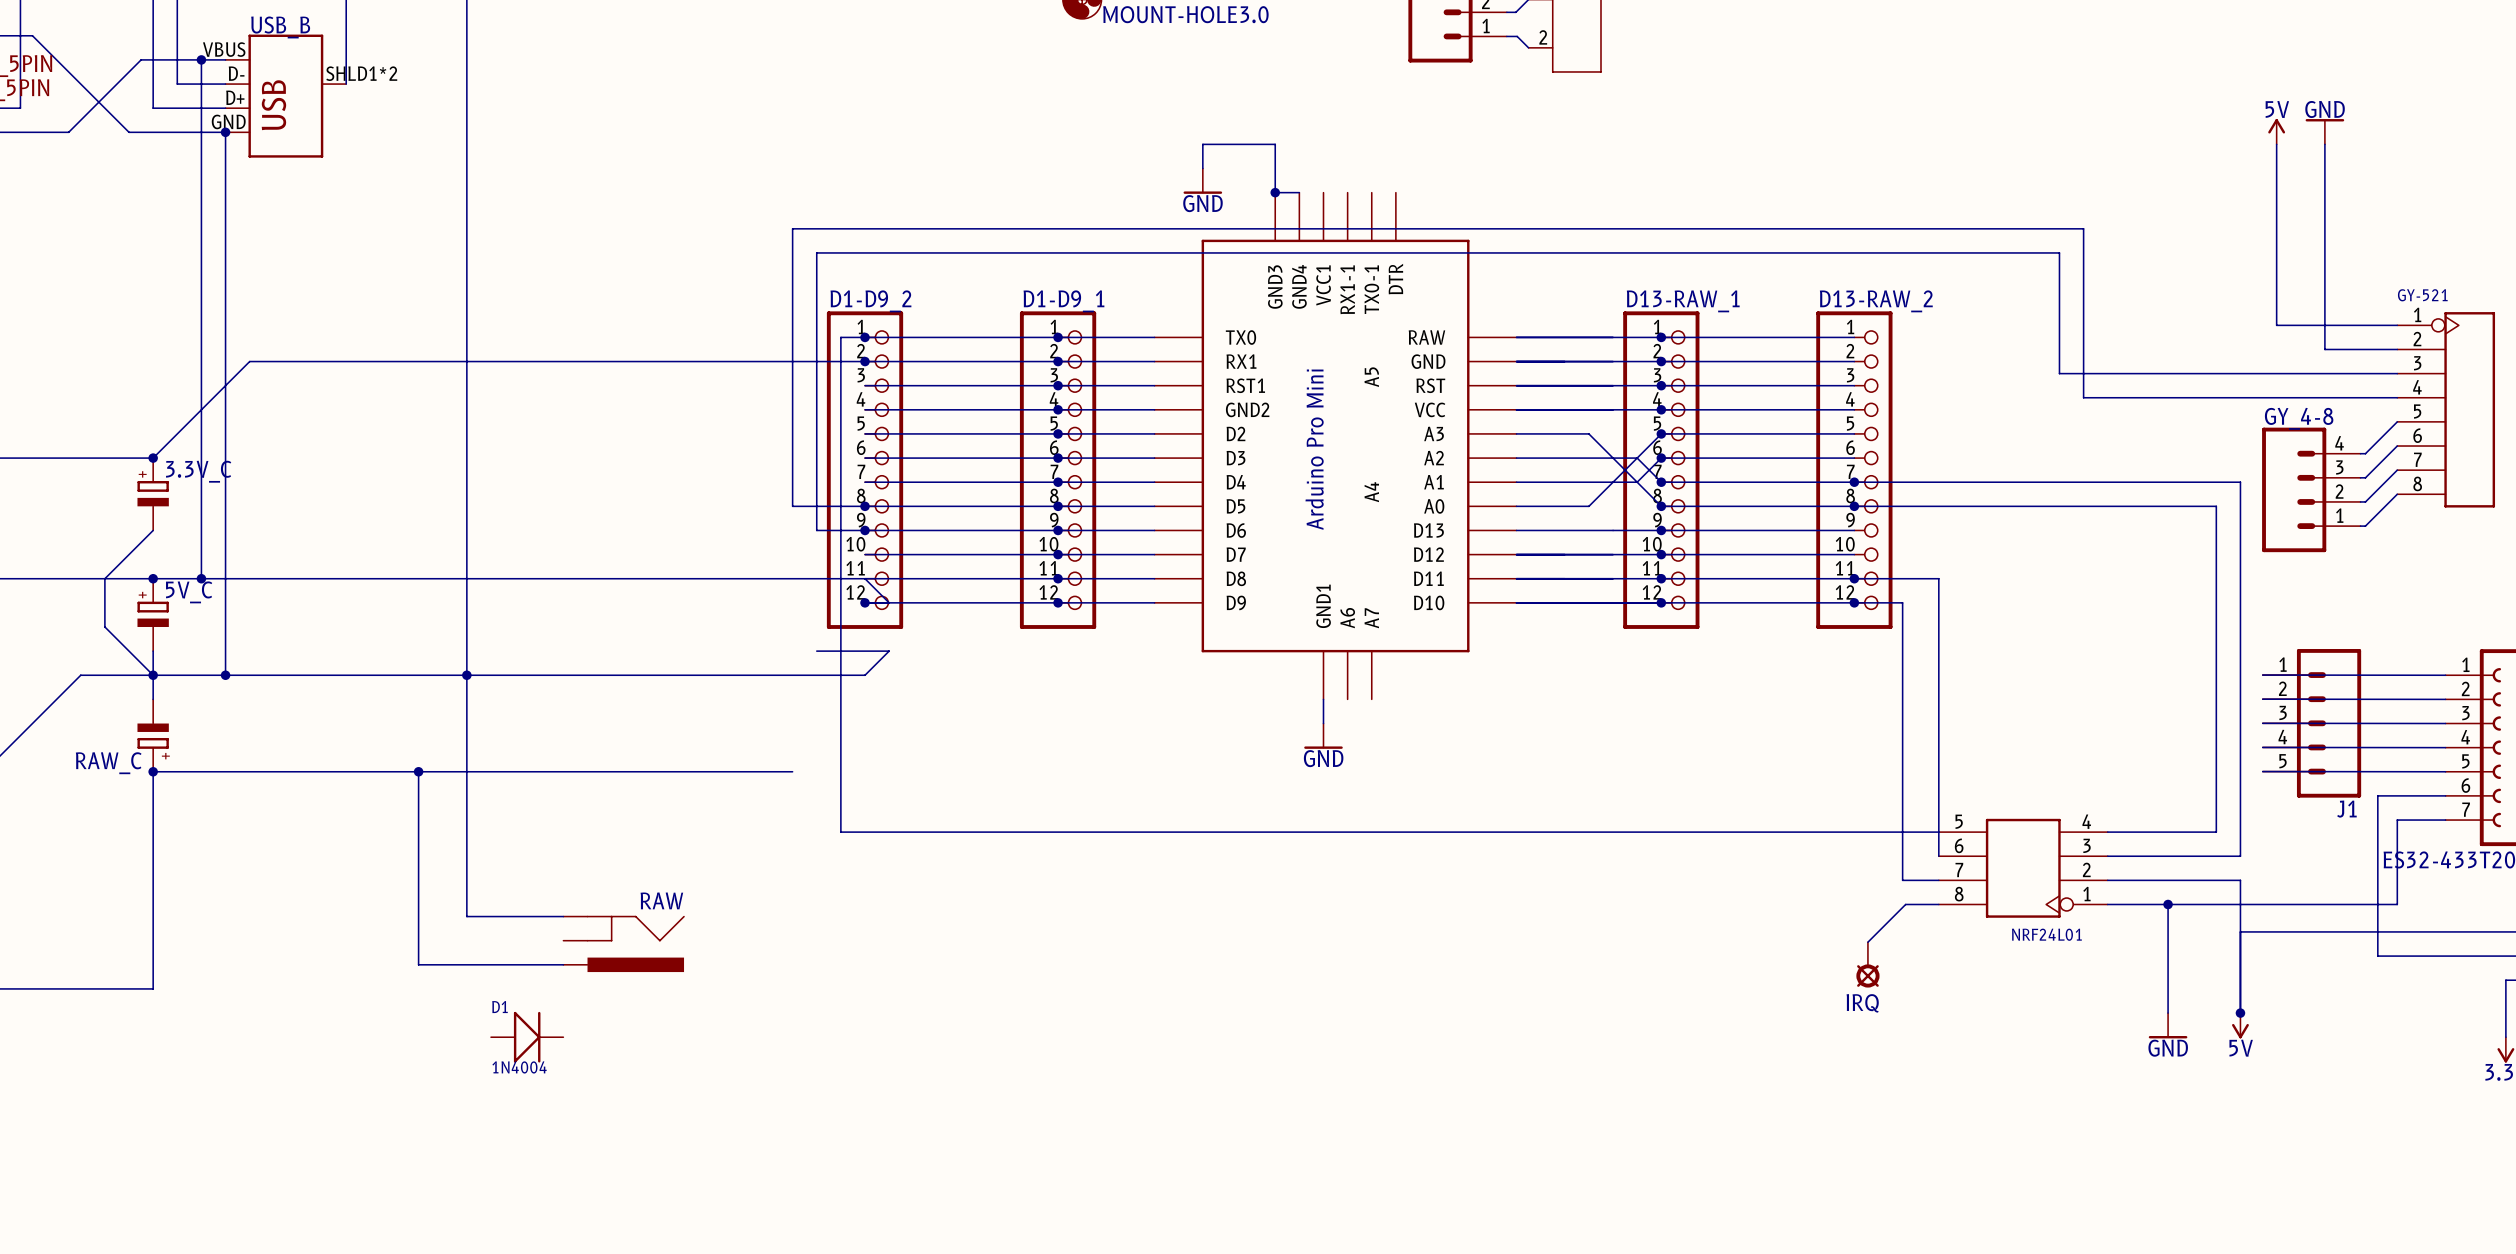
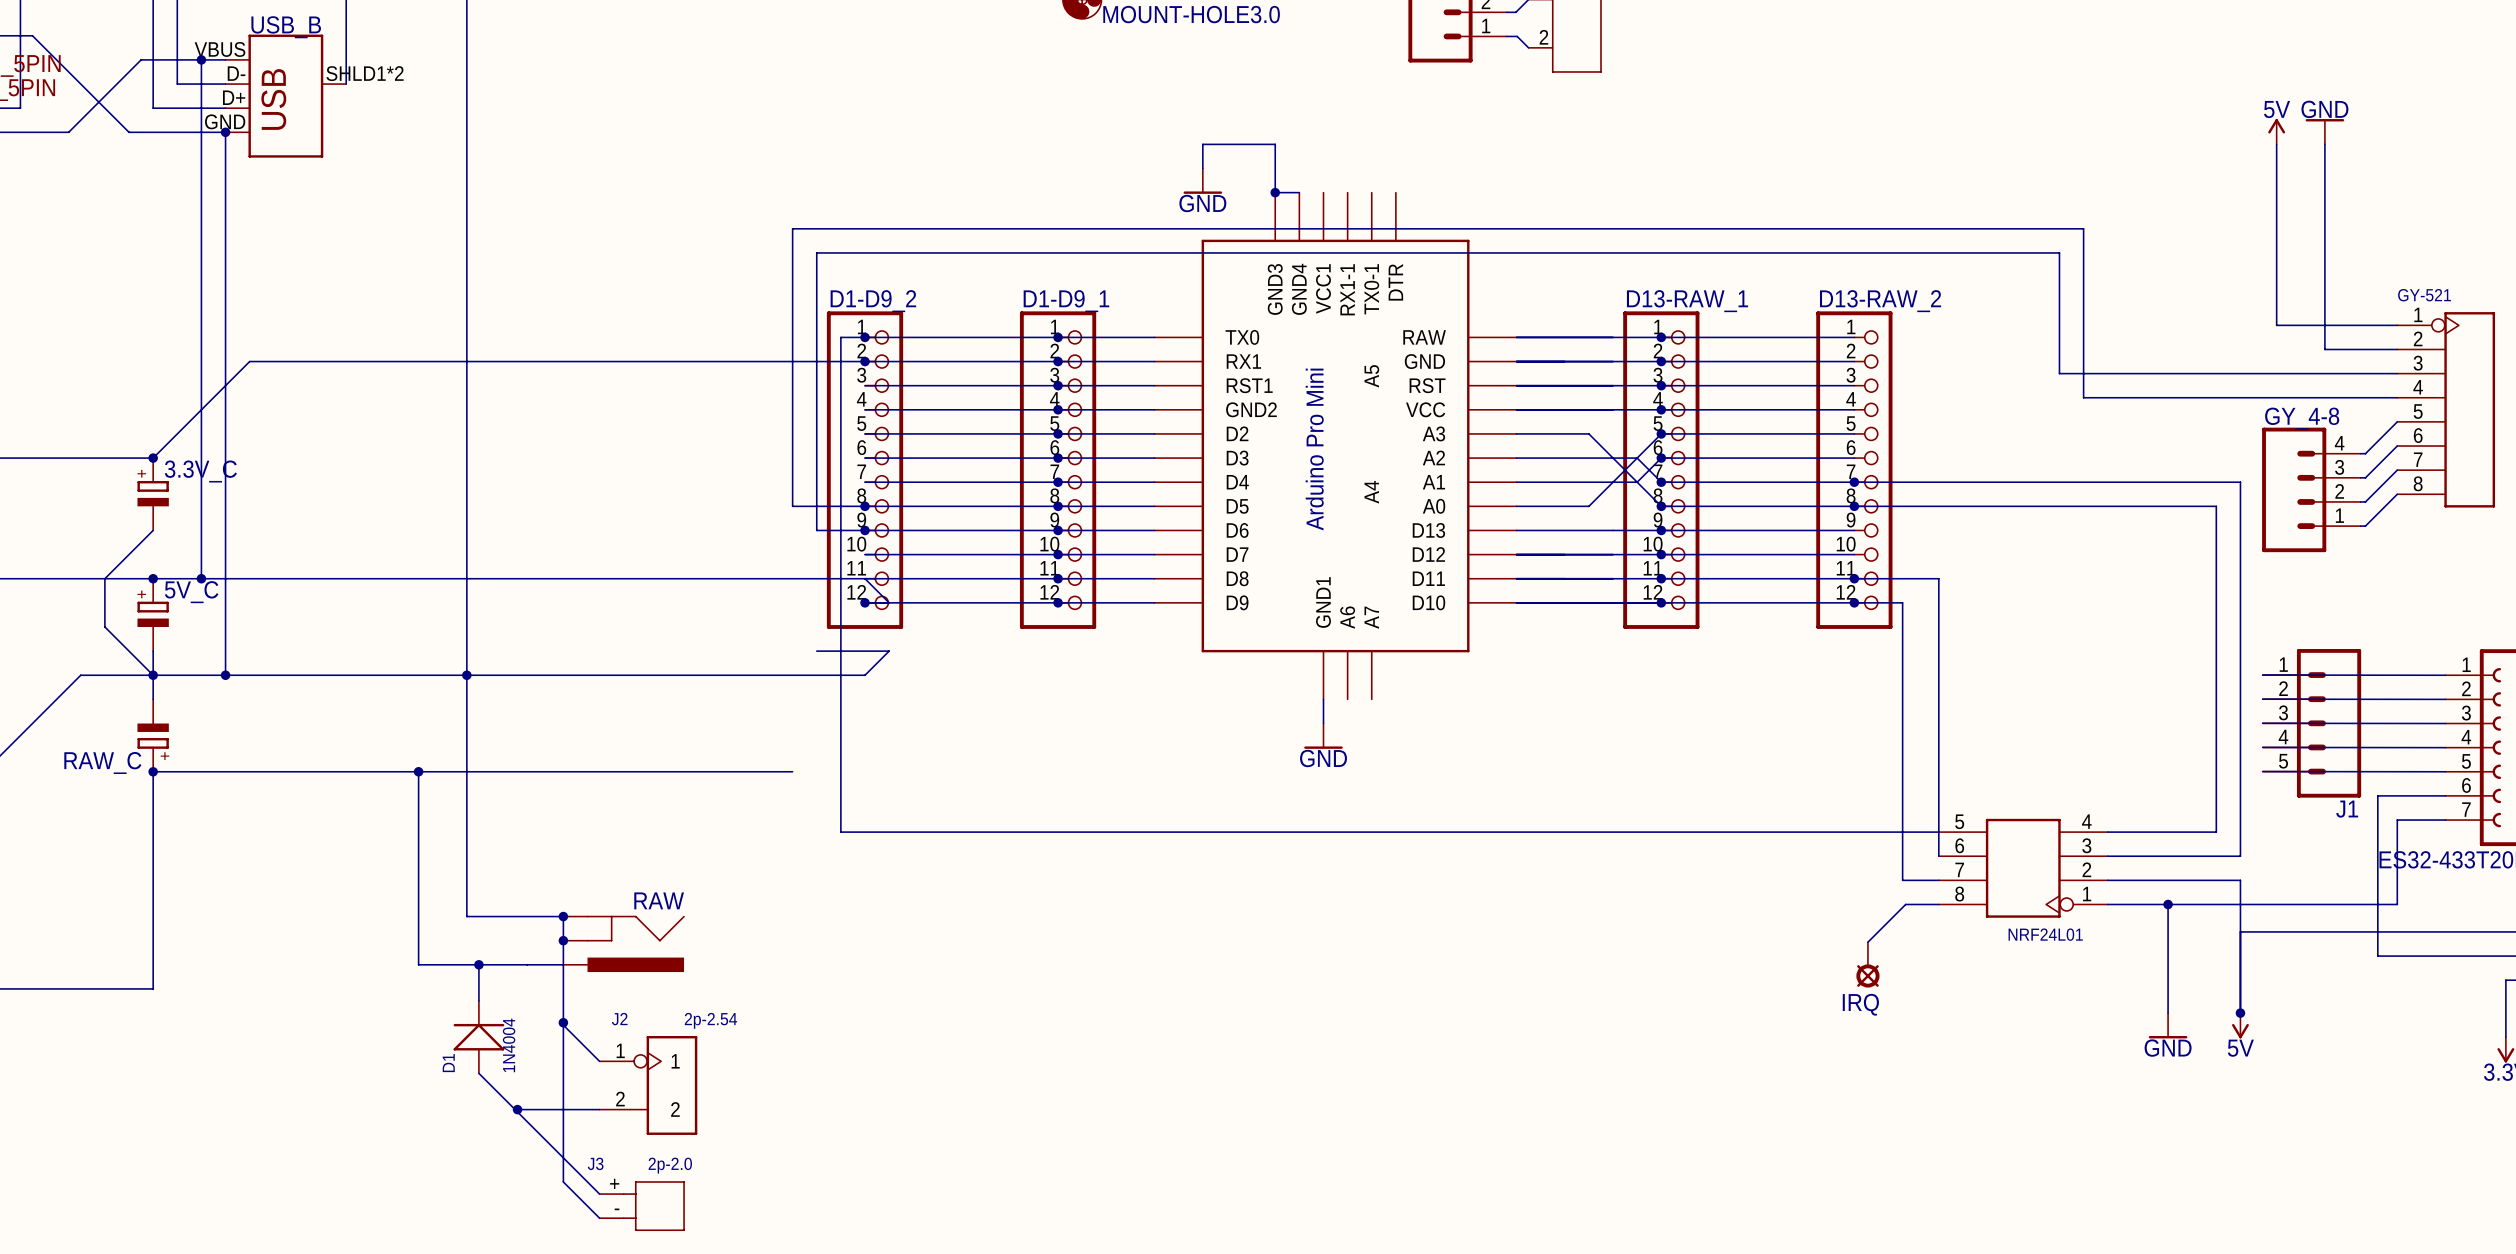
wire: none -> (563, 916) (563, 1181) (599, 1218)
junction: none -> (563, 916)
junction: none -> (563, 940)
wire: none -> (478, 964) (478, 1001)
junction: none -> (478, 964)
junction: none -> (563, 1022)
wire: none -> (563, 1025) (599, 1061)
D1 rotation: 0° (527, 1037) -> 90° counterclockwise (478, 1037)
D1 position: (527, 1037) -> (478, 1037)
wire: none -> (478, 1073) (515, 1109) (599, 1109)
J2: none -> 2p-2.54 (648, 1085)
wire: none -> (517, 1109) (517, 1112) (599, 1194)
junction: none -> (517, 1109)
J3: none -> 2p-2.0 (642, 1206)

